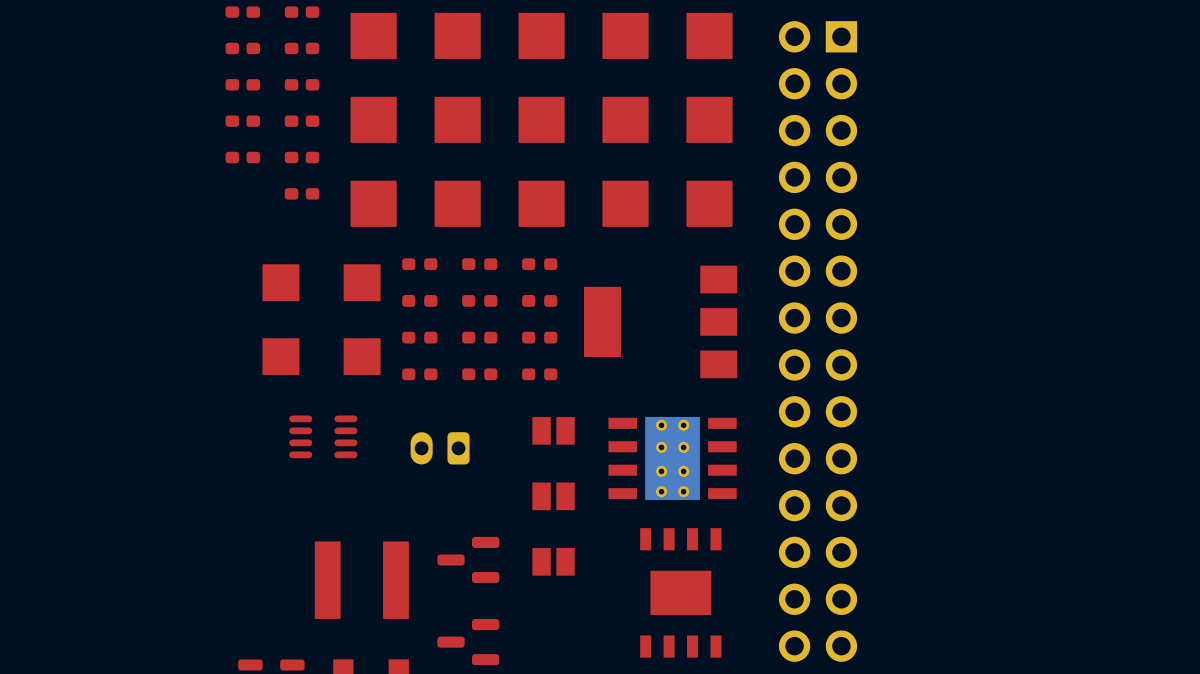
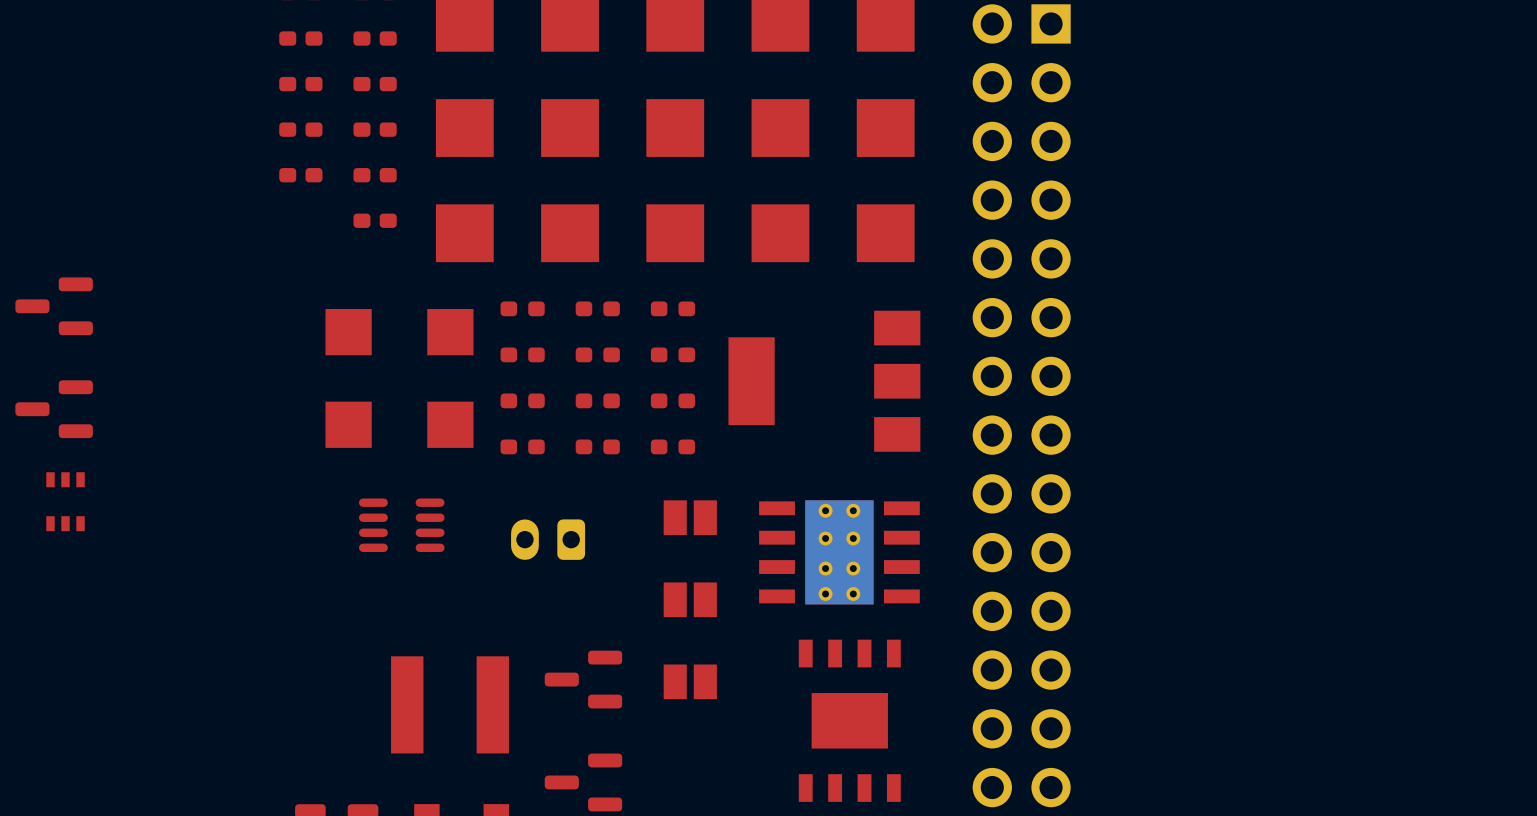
part: none -> (54, 306)
part: none -> (54, 409)
part: none -> (65, 501)

